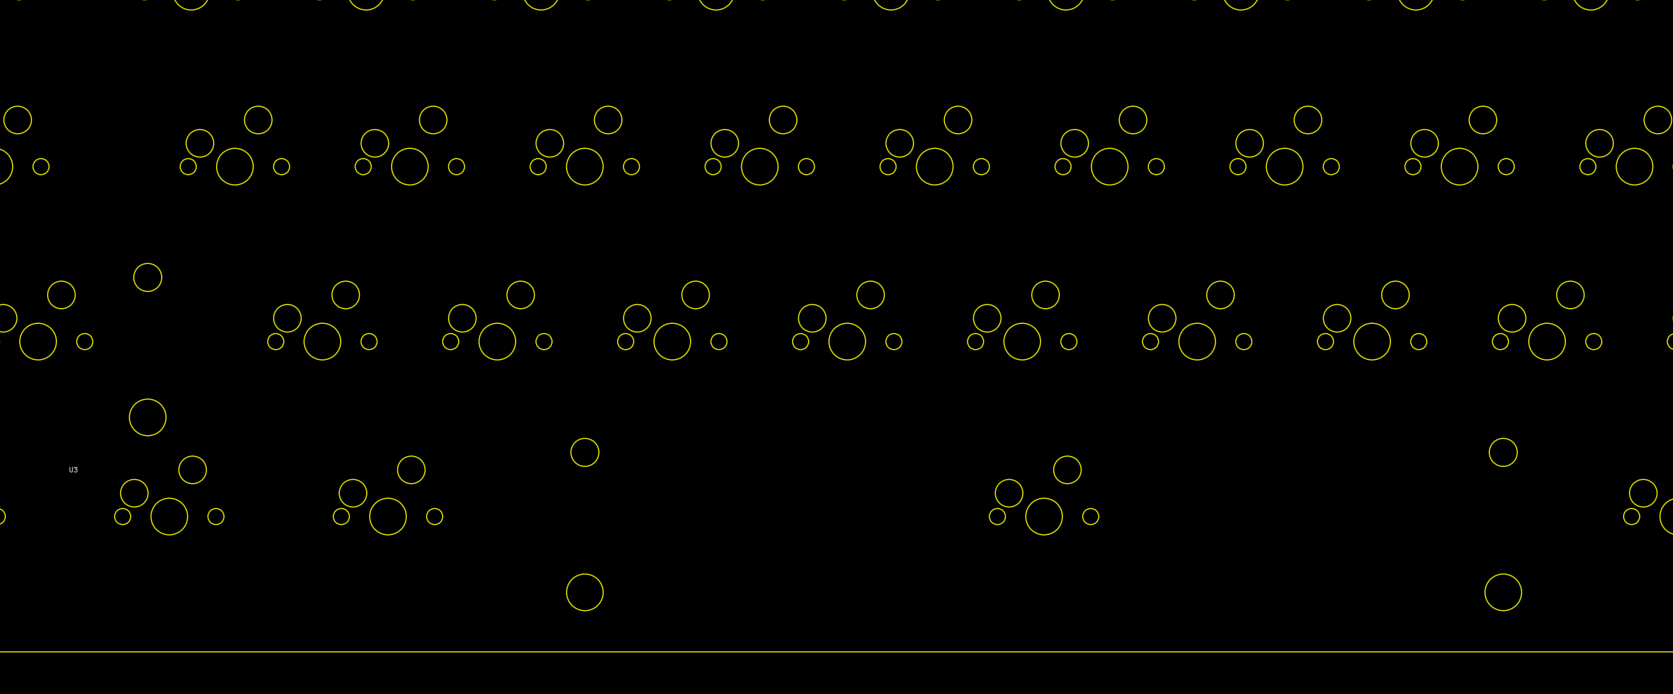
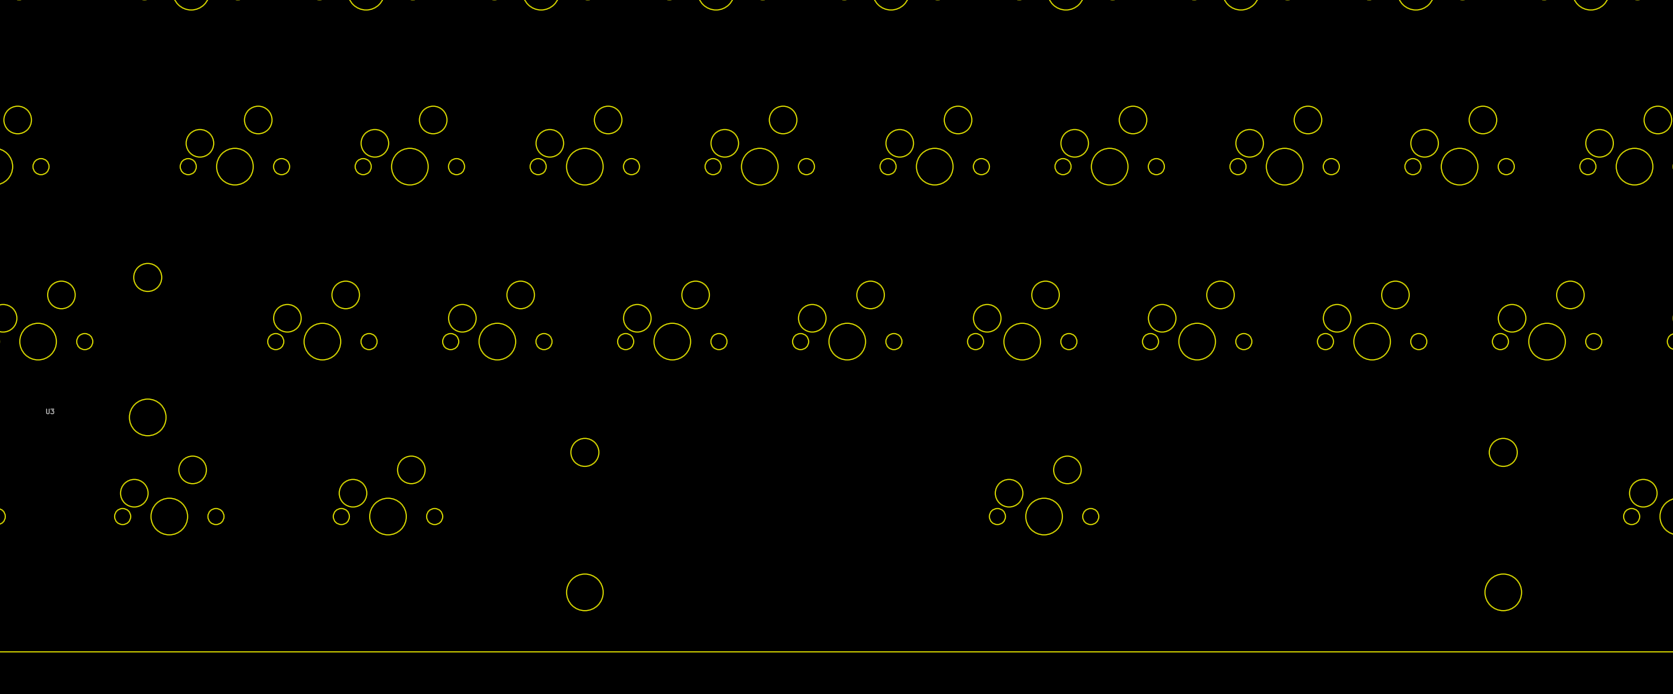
part position: (73, 469) -> (50, 411)

